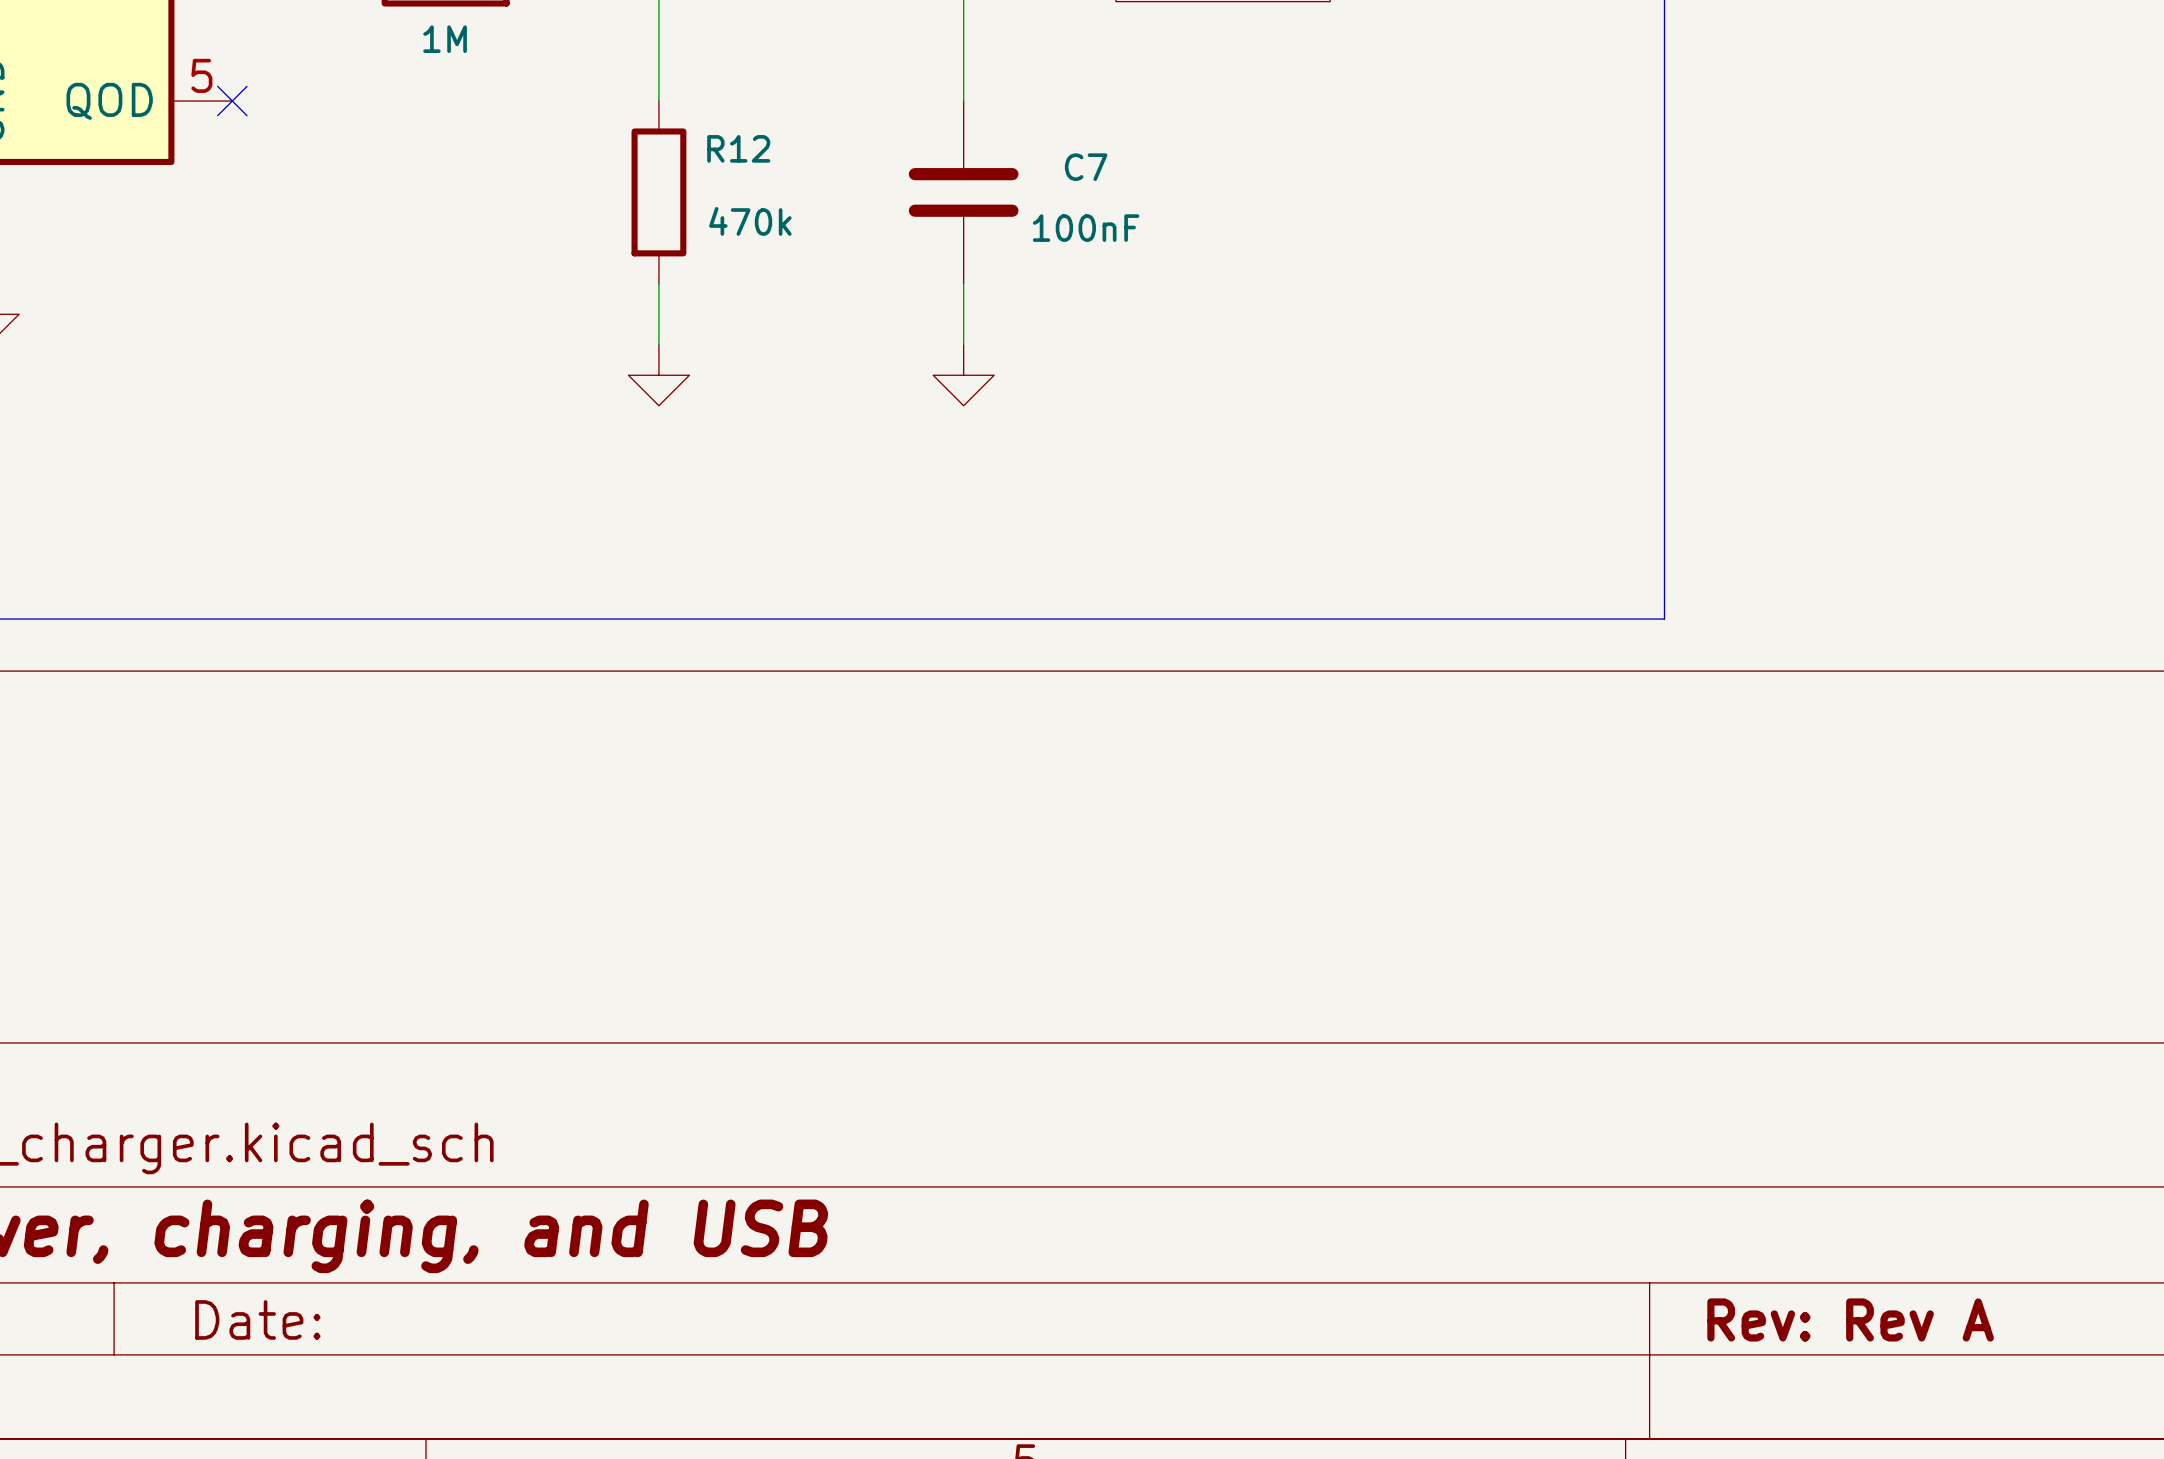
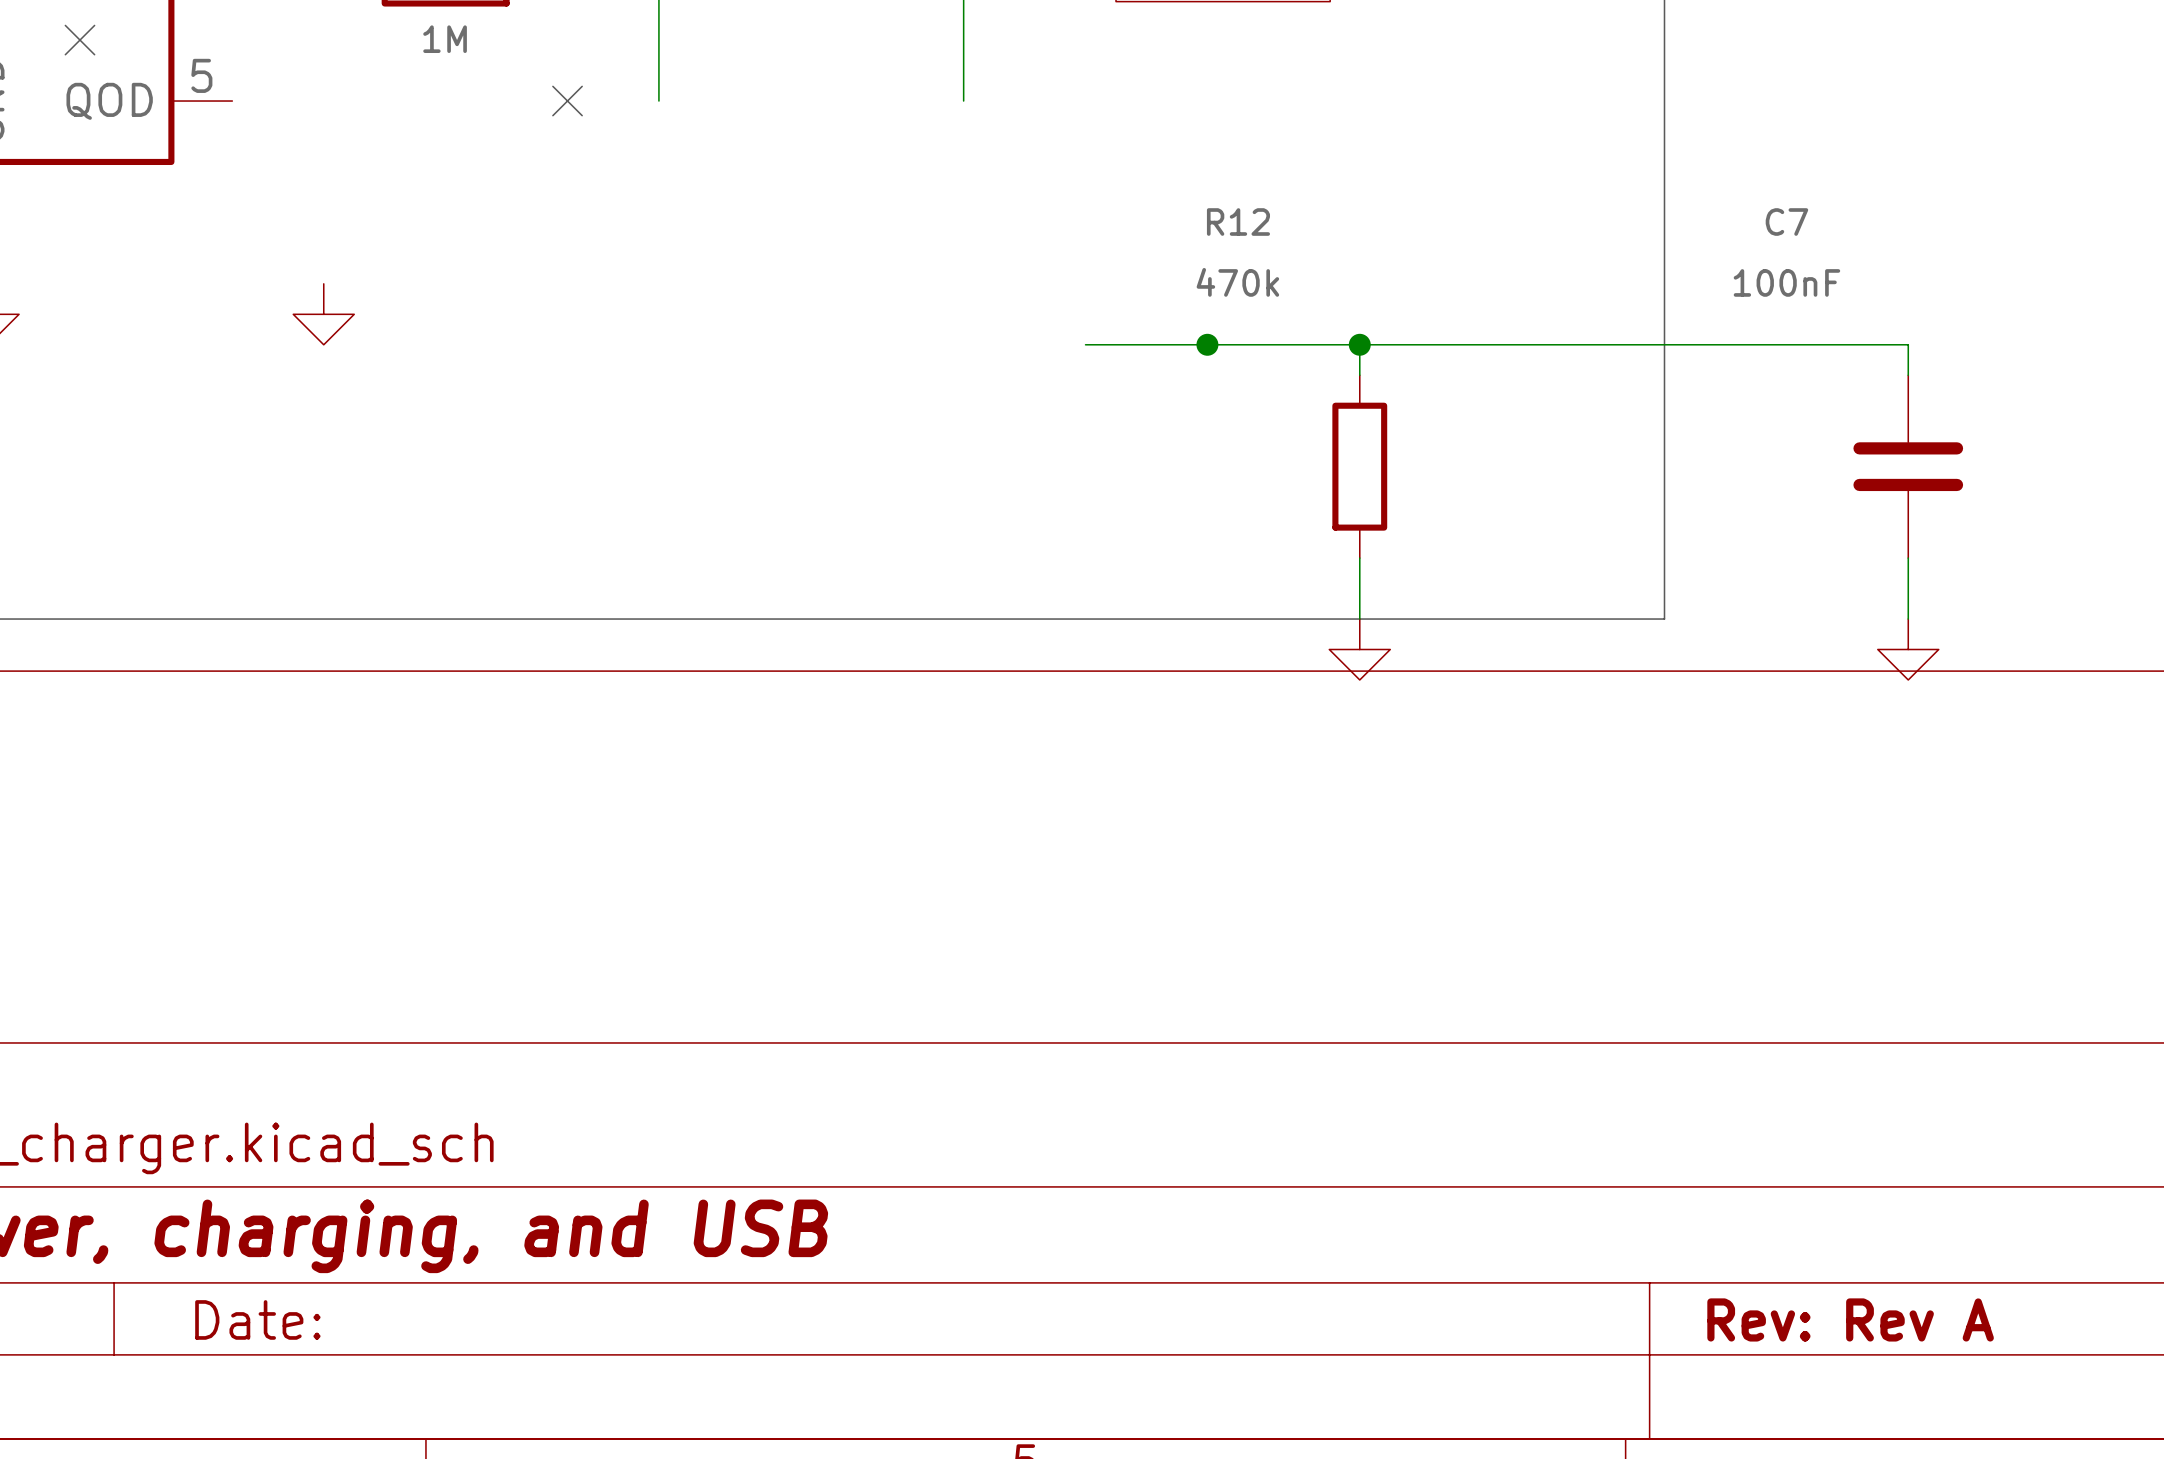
no-connect mark: none -> (79, 40)
no-connect mark: (232, 101) -> none
no-connect mark: none -> (567, 101)
R12 name position: R12 (738, 148) -> R12 (1238, 222)
C7 name position: C7 (1086, 167) -> C7 (1786, 222)
R12 position: (658, 192) -> (1359, 466)
C7 position: (963, 192) -> (1908, 466)
R12 value position: 470k (750, 221) -> 470k (1237, 282)
C7 value position: 100nF (1086, 228) -> 100nF (1786, 282)
wire: (658, 283) (658, 344) -> none
wire: (963, 283) (963, 344) -> (1359, 558) (1359, 619)
power symbol: none -> (323, 314)
wire: none -> (1085, 344) (1908, 344) (1908, 375)
junction: none -> (1207, 344)
wire: none -> (1359, 344) (1359, 375)
junction: none -> (1359, 344)
power symbol: (658, 375) -> none
power symbol: (963, 375) -> none
wire: none -> (1908, 558) (1908, 619)
power symbol: none -> (1359, 649)
power symbol: none -> (1908, 649)

